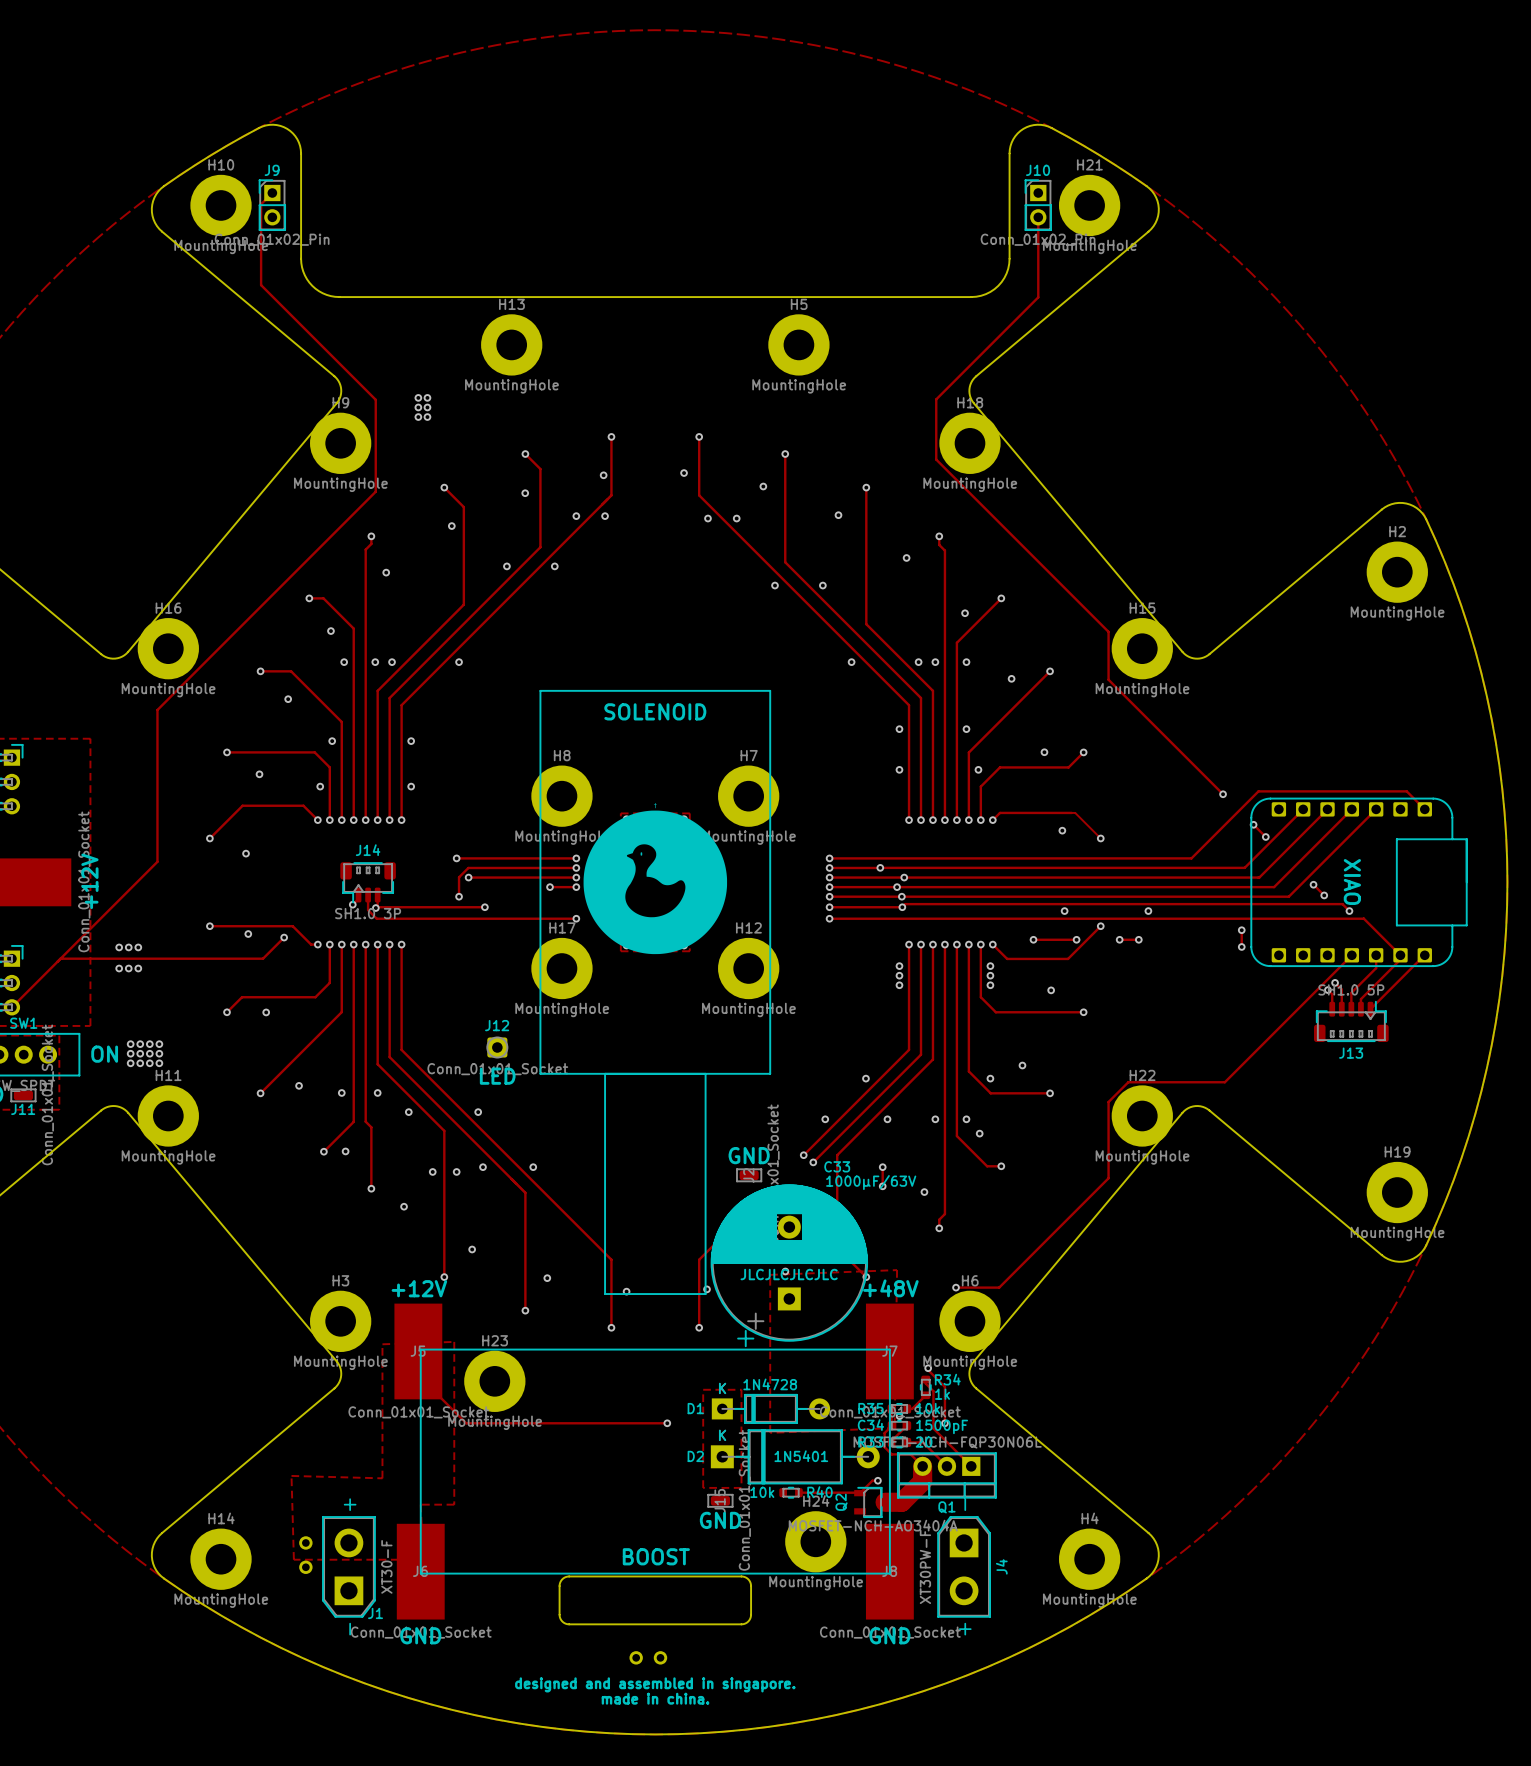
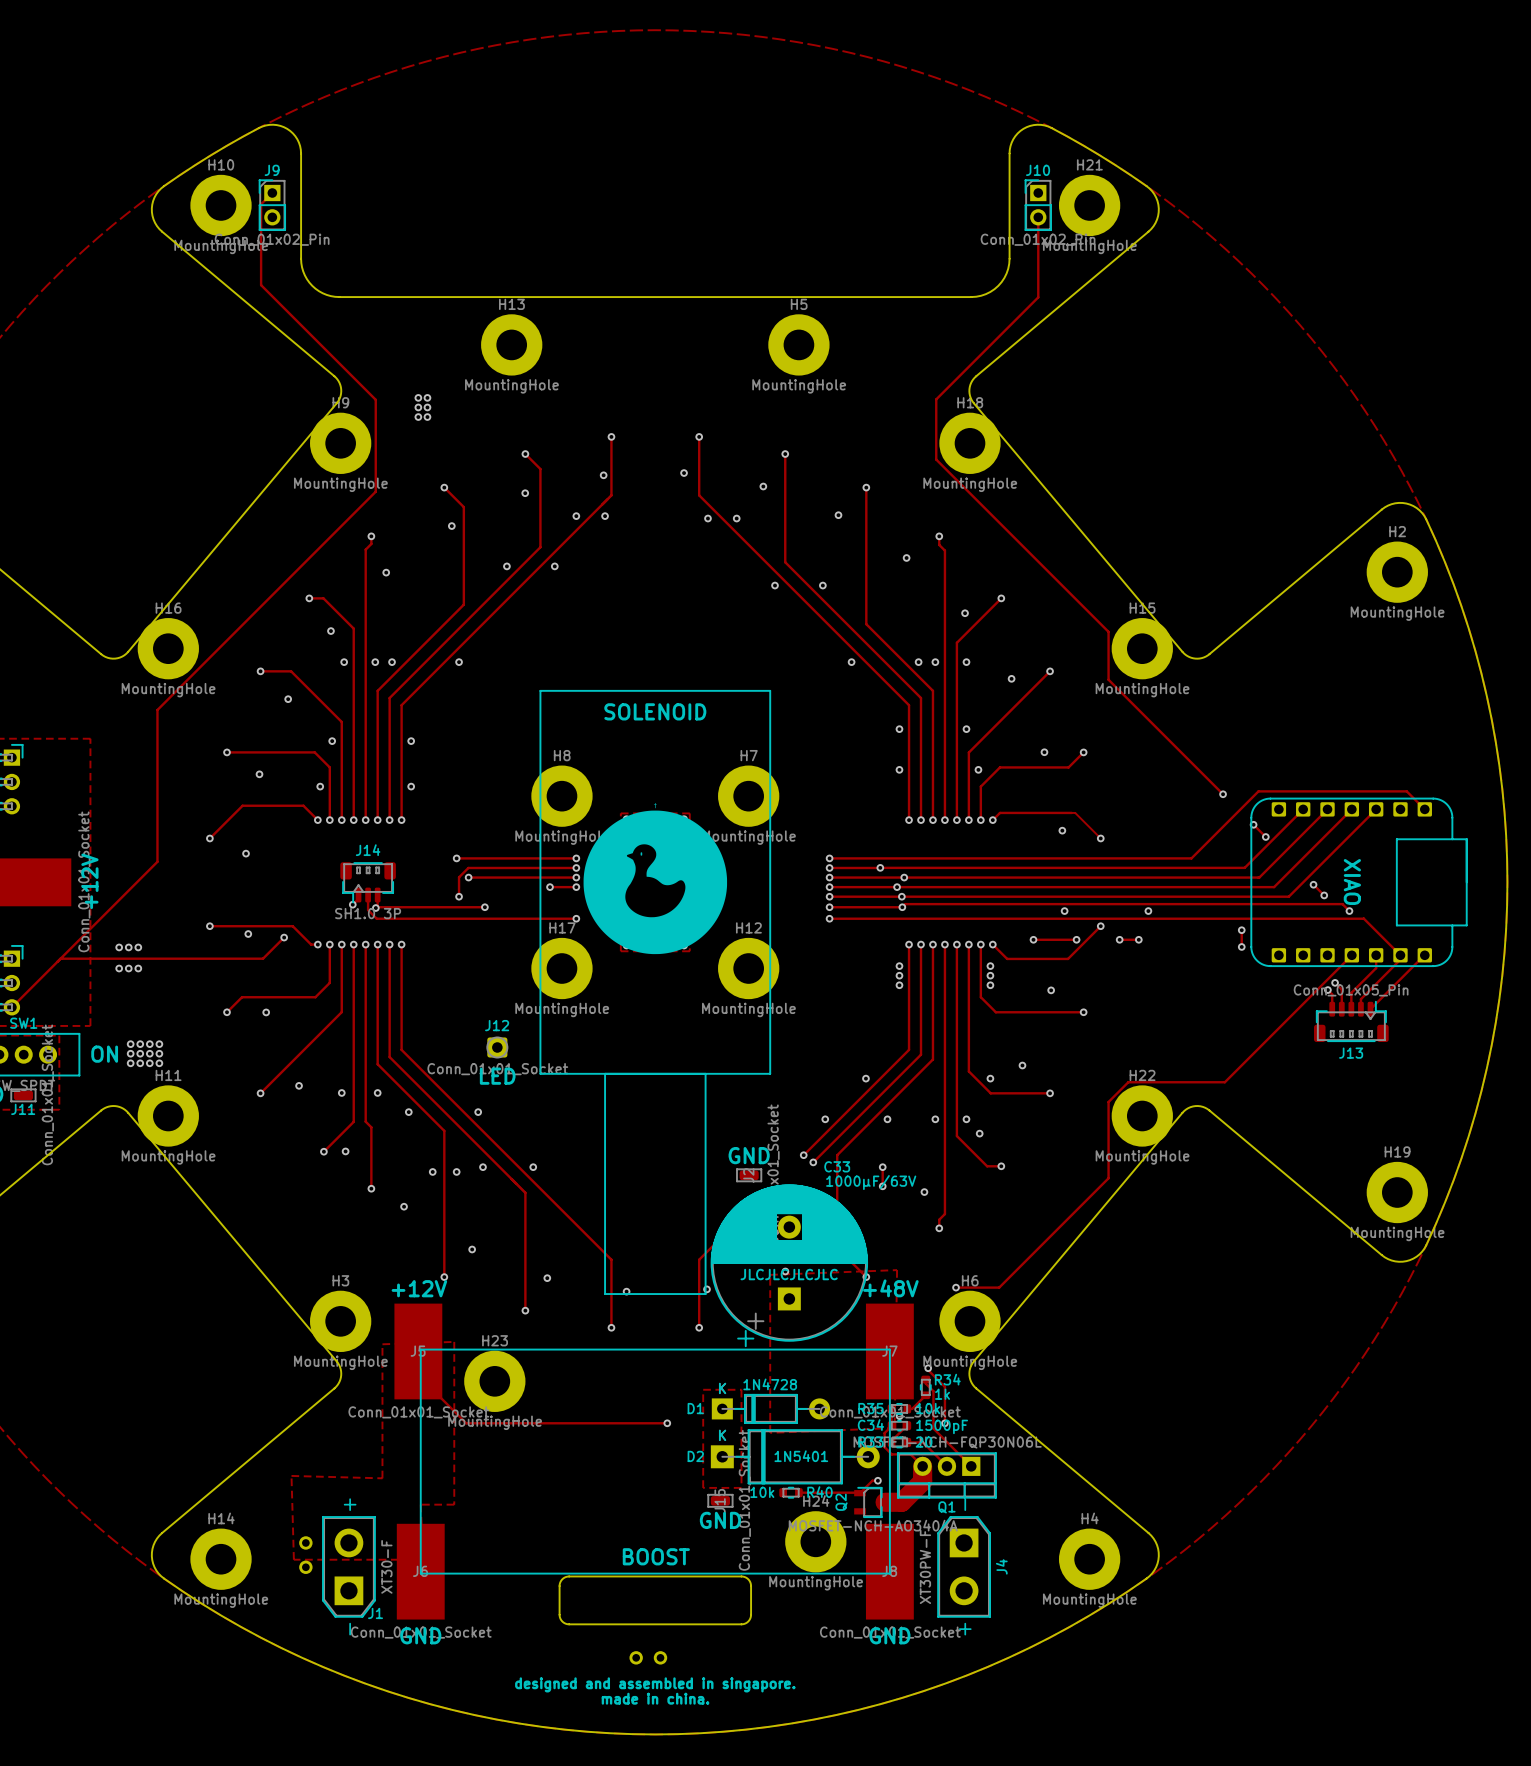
J13 value: SH1.0 5P (1351, 989) -> Conn_01x05_Pin (1351, 990)

